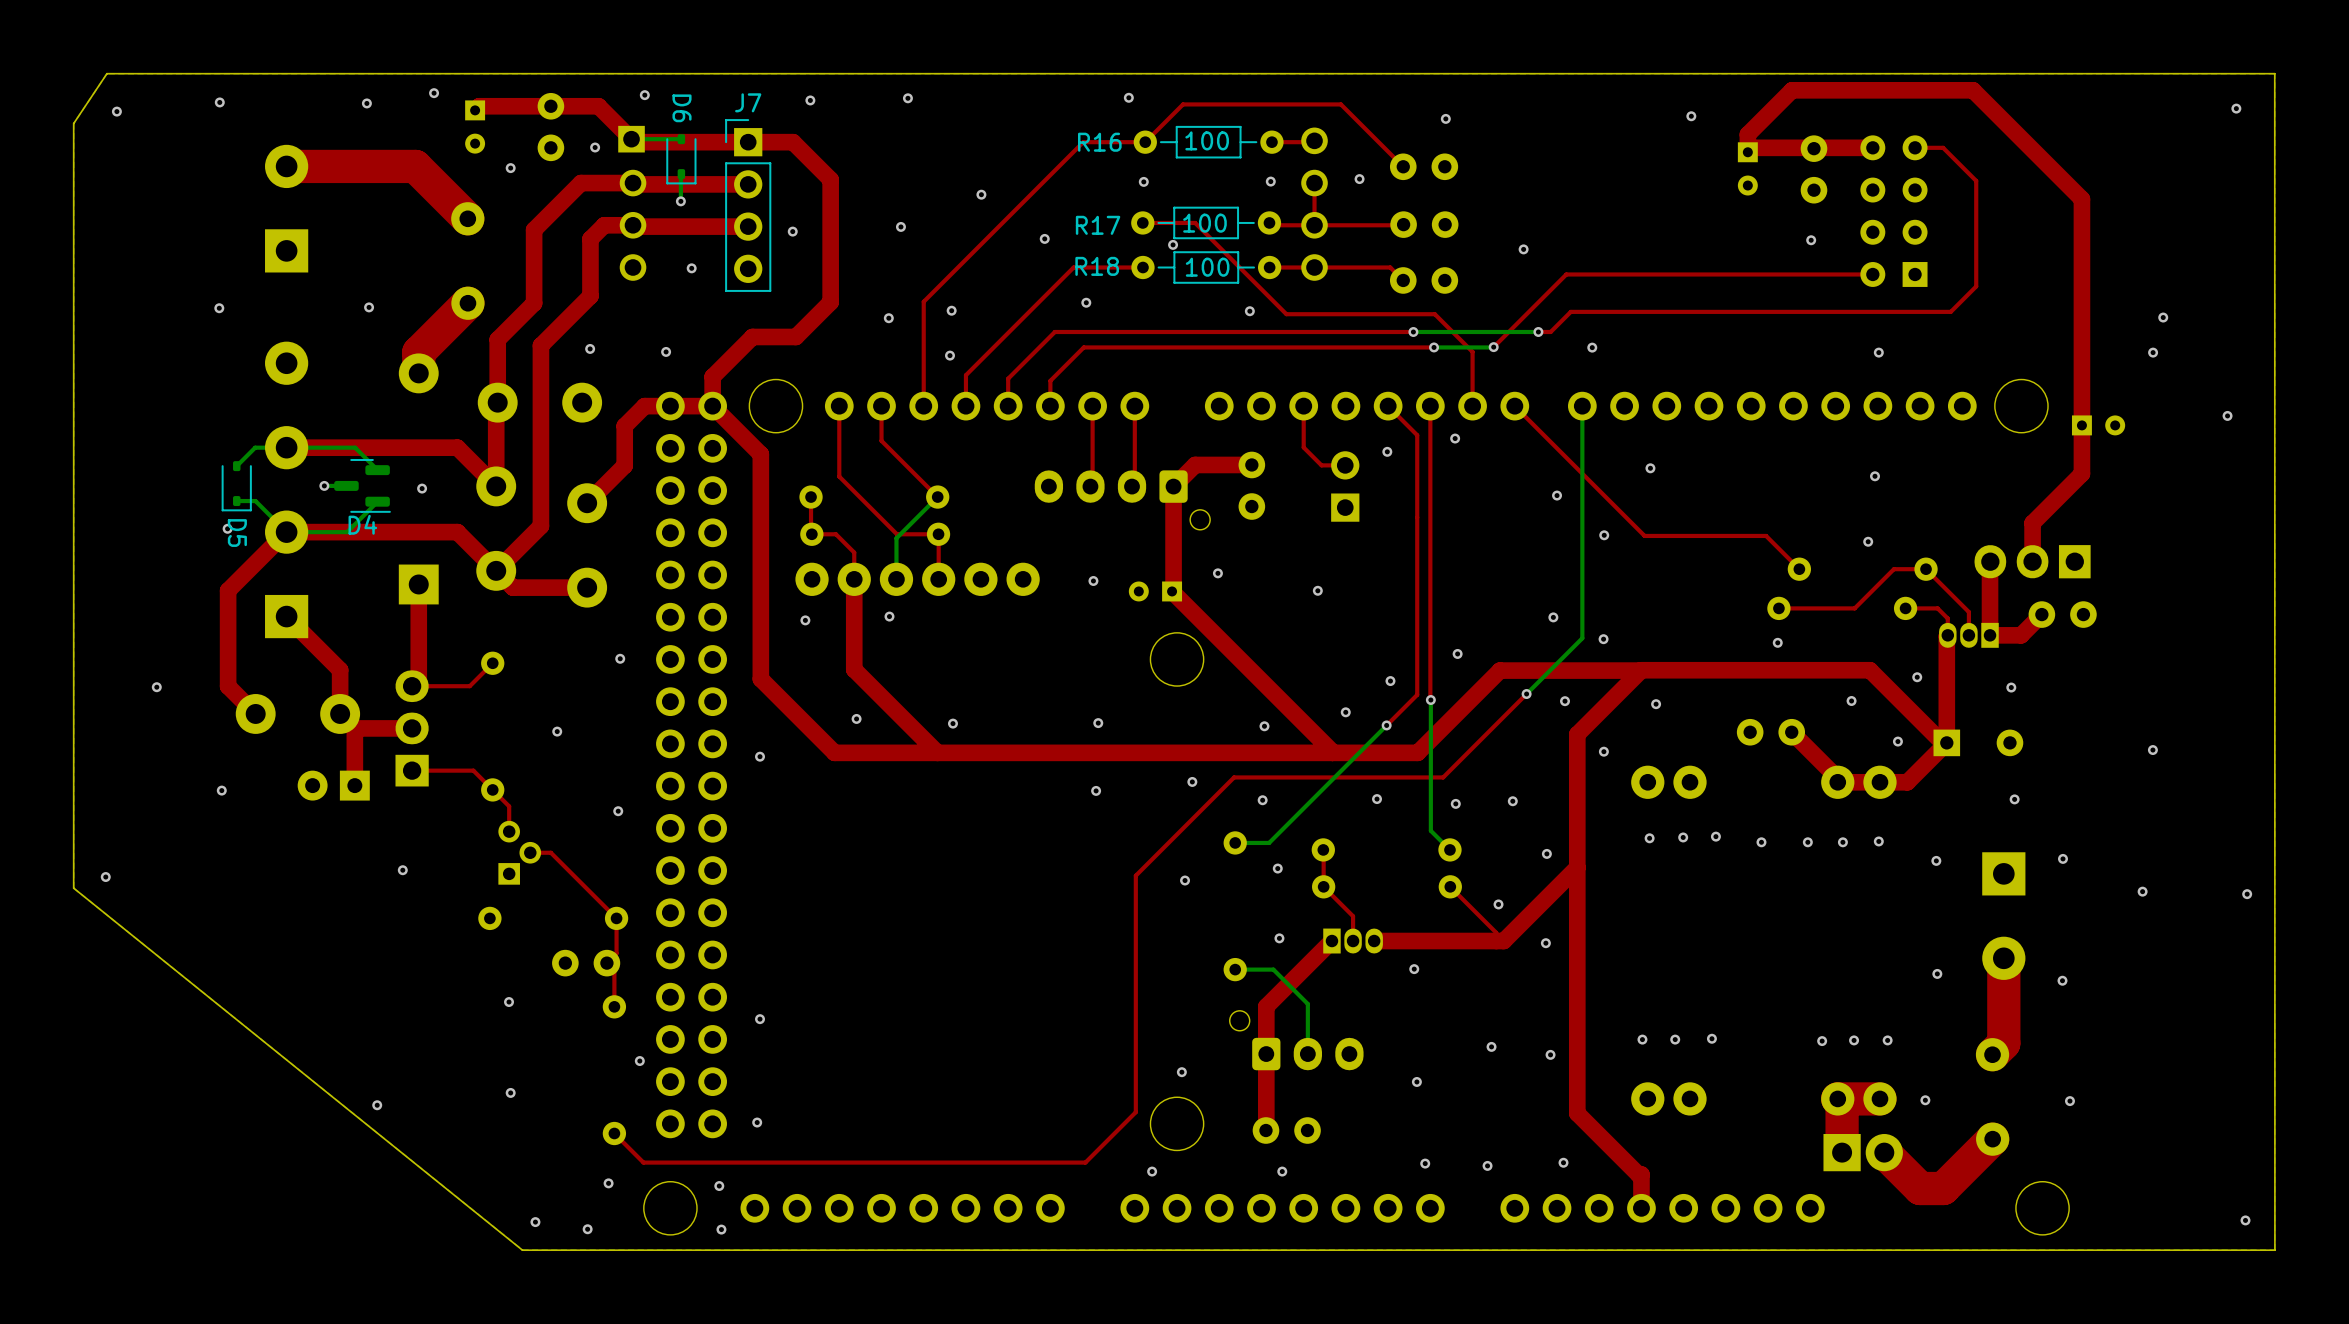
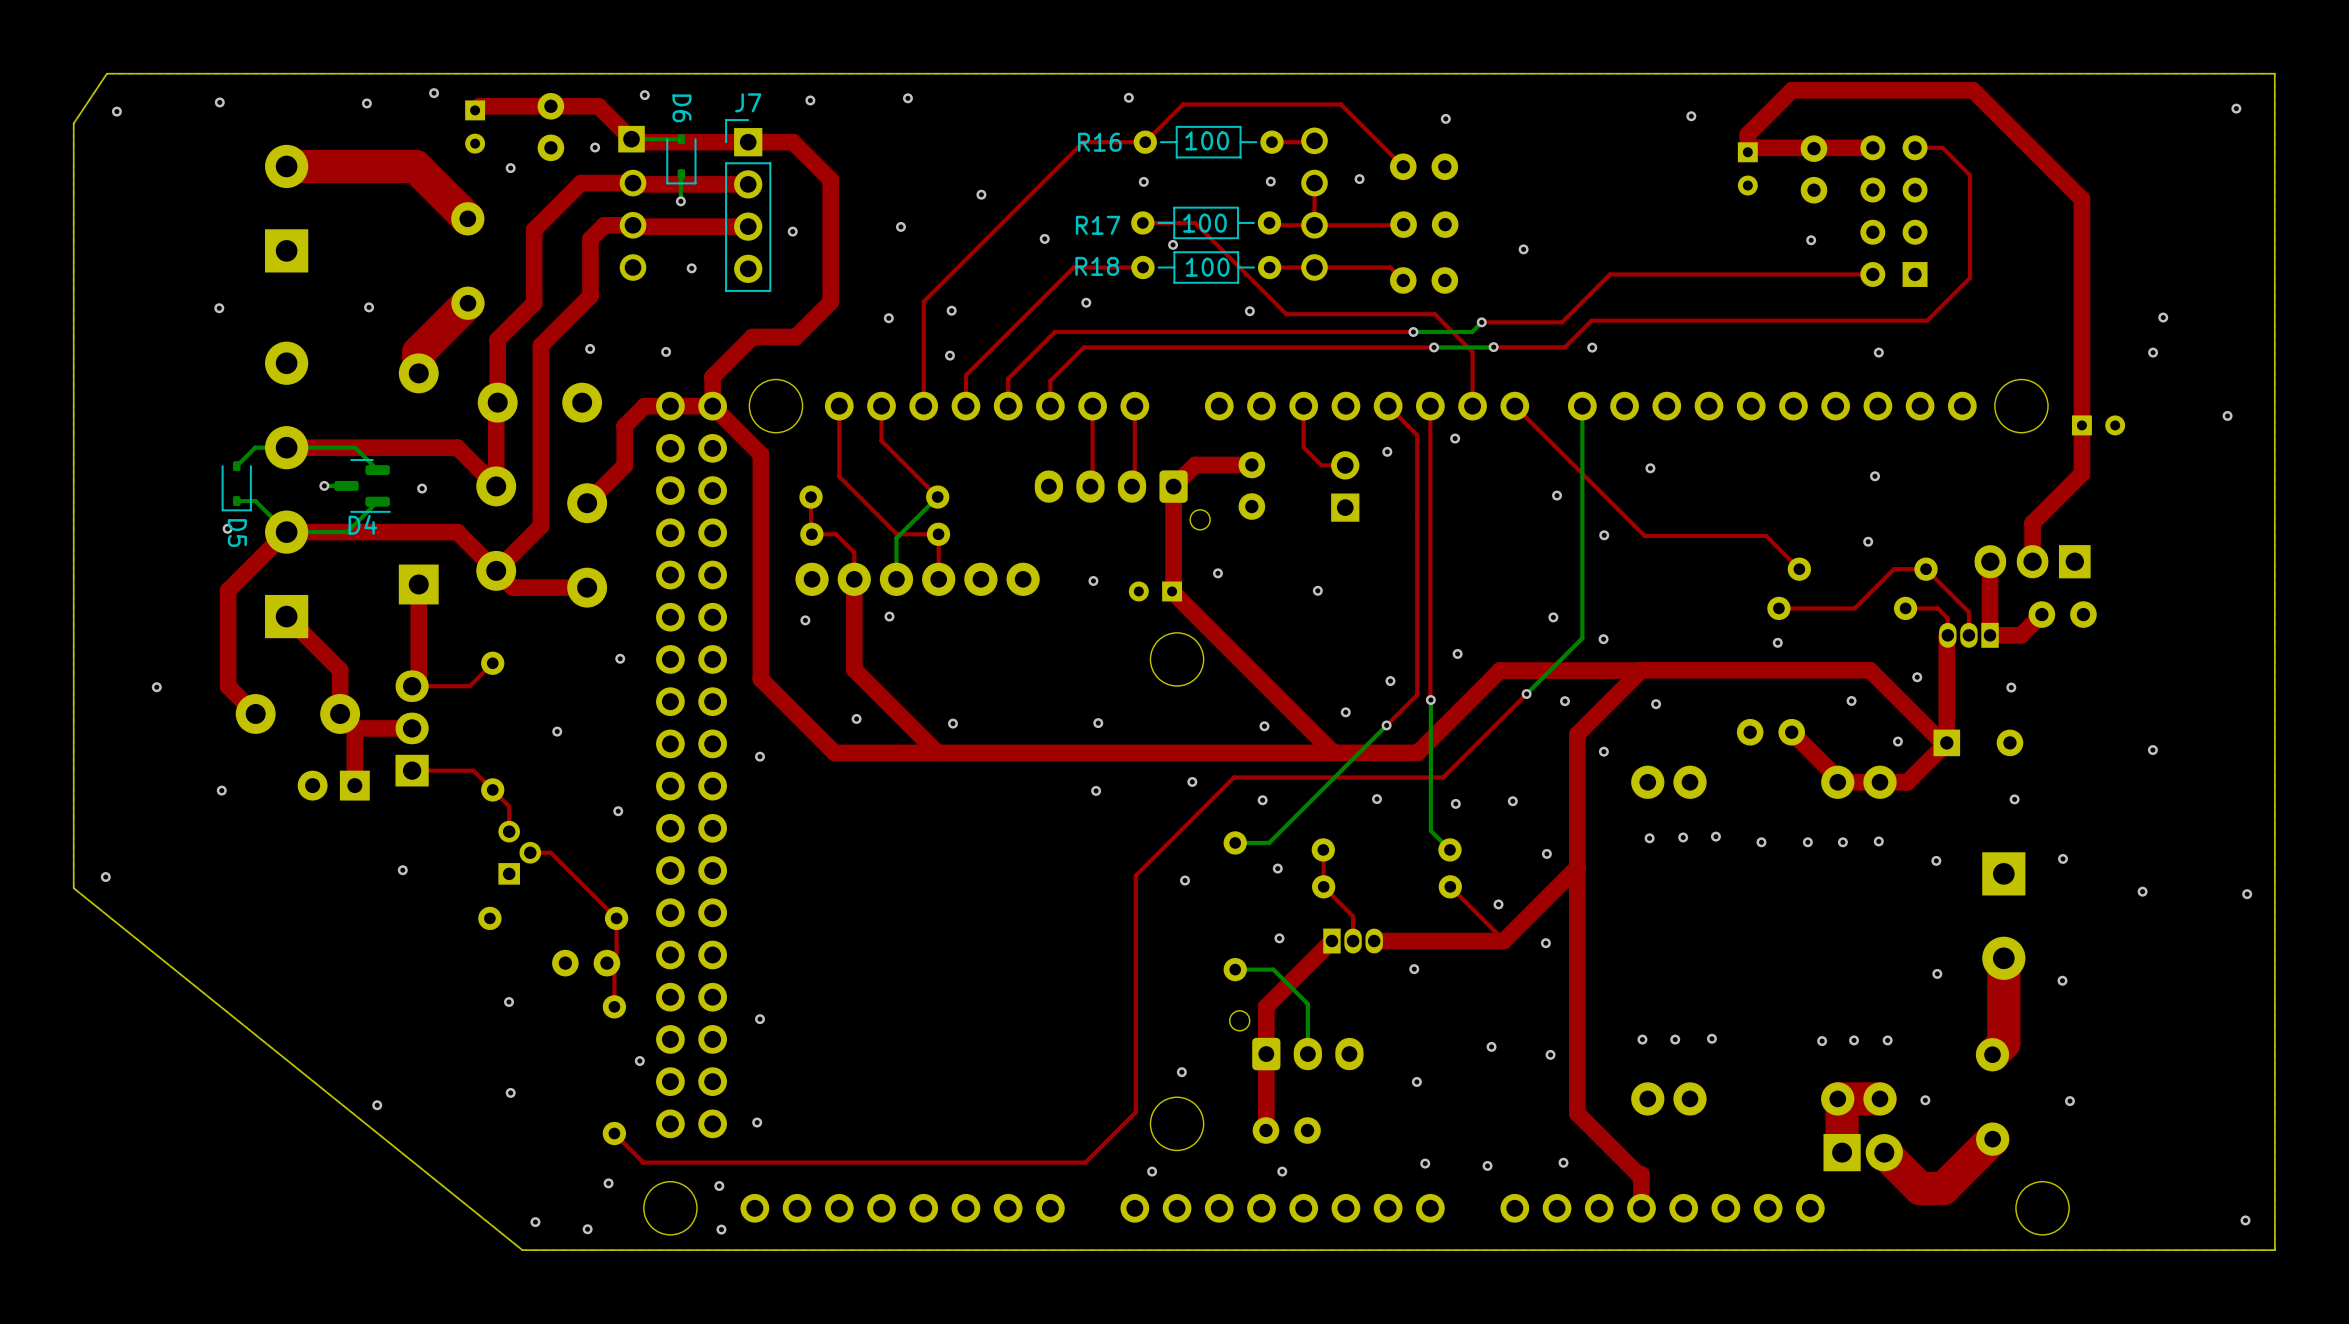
top track: (1942, 147) (1976, 180) (1976, 286) (1950, 311) (1570, 311) (1550, 331) (1538, 331) -> (1942, 147) (1970, 175) (1970, 277) (1927, 320) (1591, 320) (1564, 347) (1488, 347)
top track: (1609, 274) (1566, 274) (1493, 347) -> (1609, 274) (1562, 322) (1481, 322)
bottom track: (1538, 331) (1472, 331) -> (1481, 322) (1472, 331)
via position: (1538, 331) -> (1481, 322)

